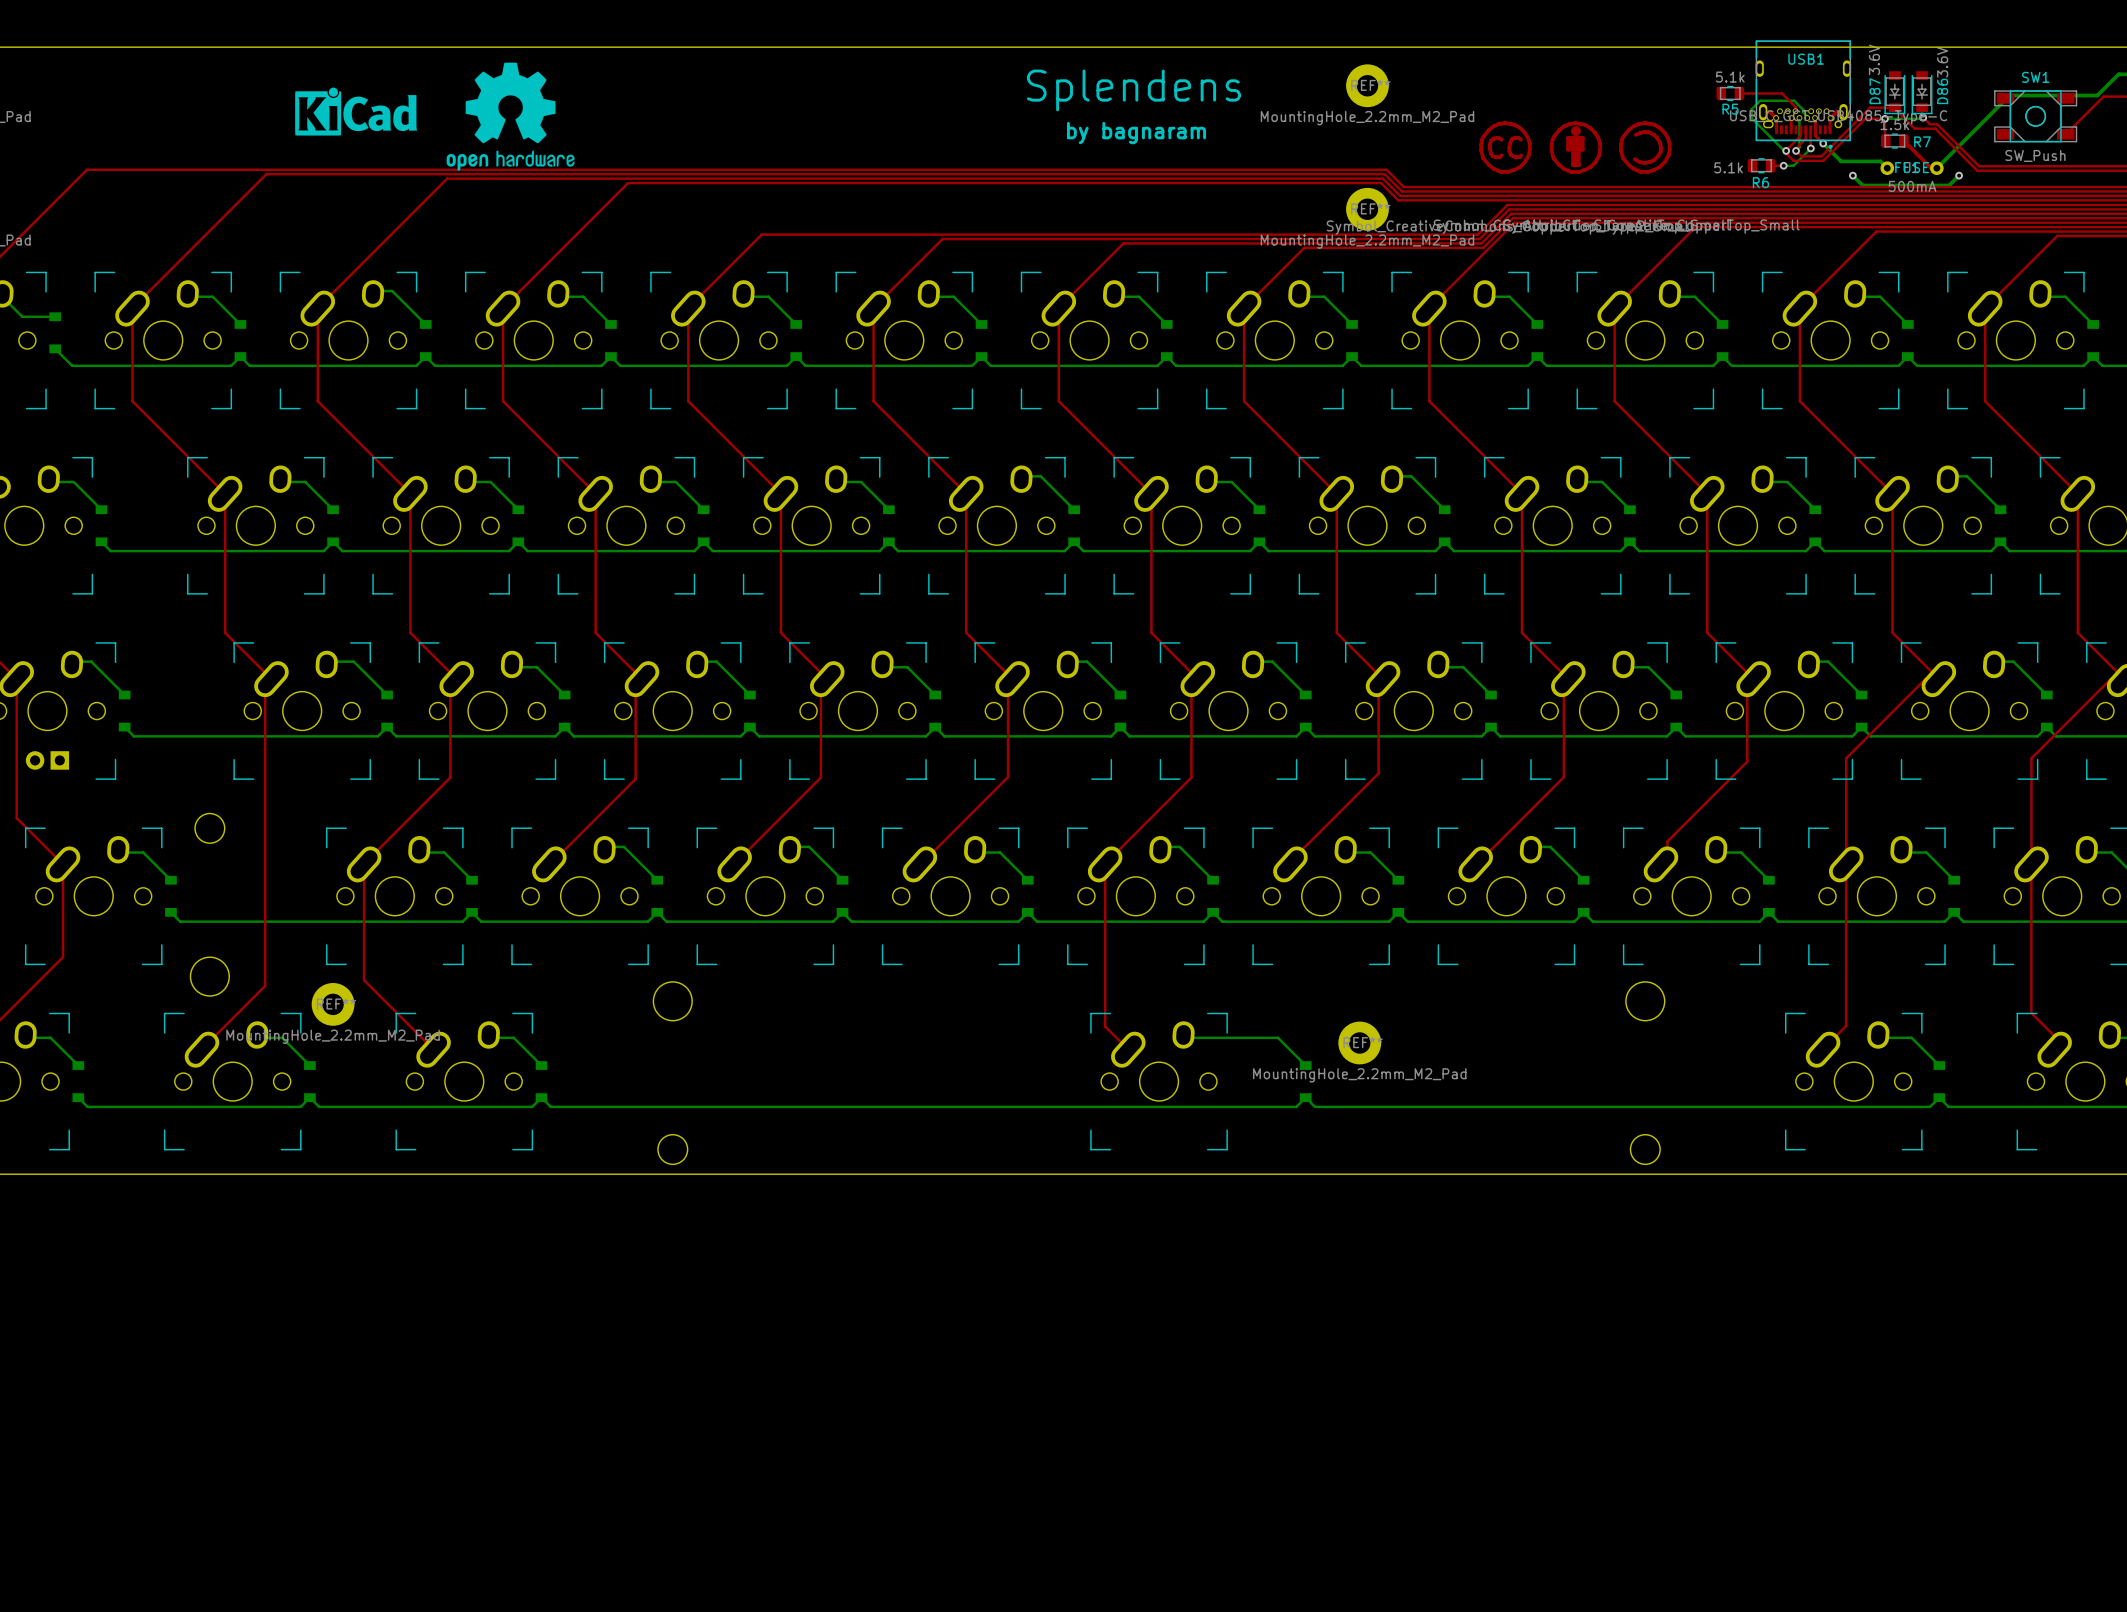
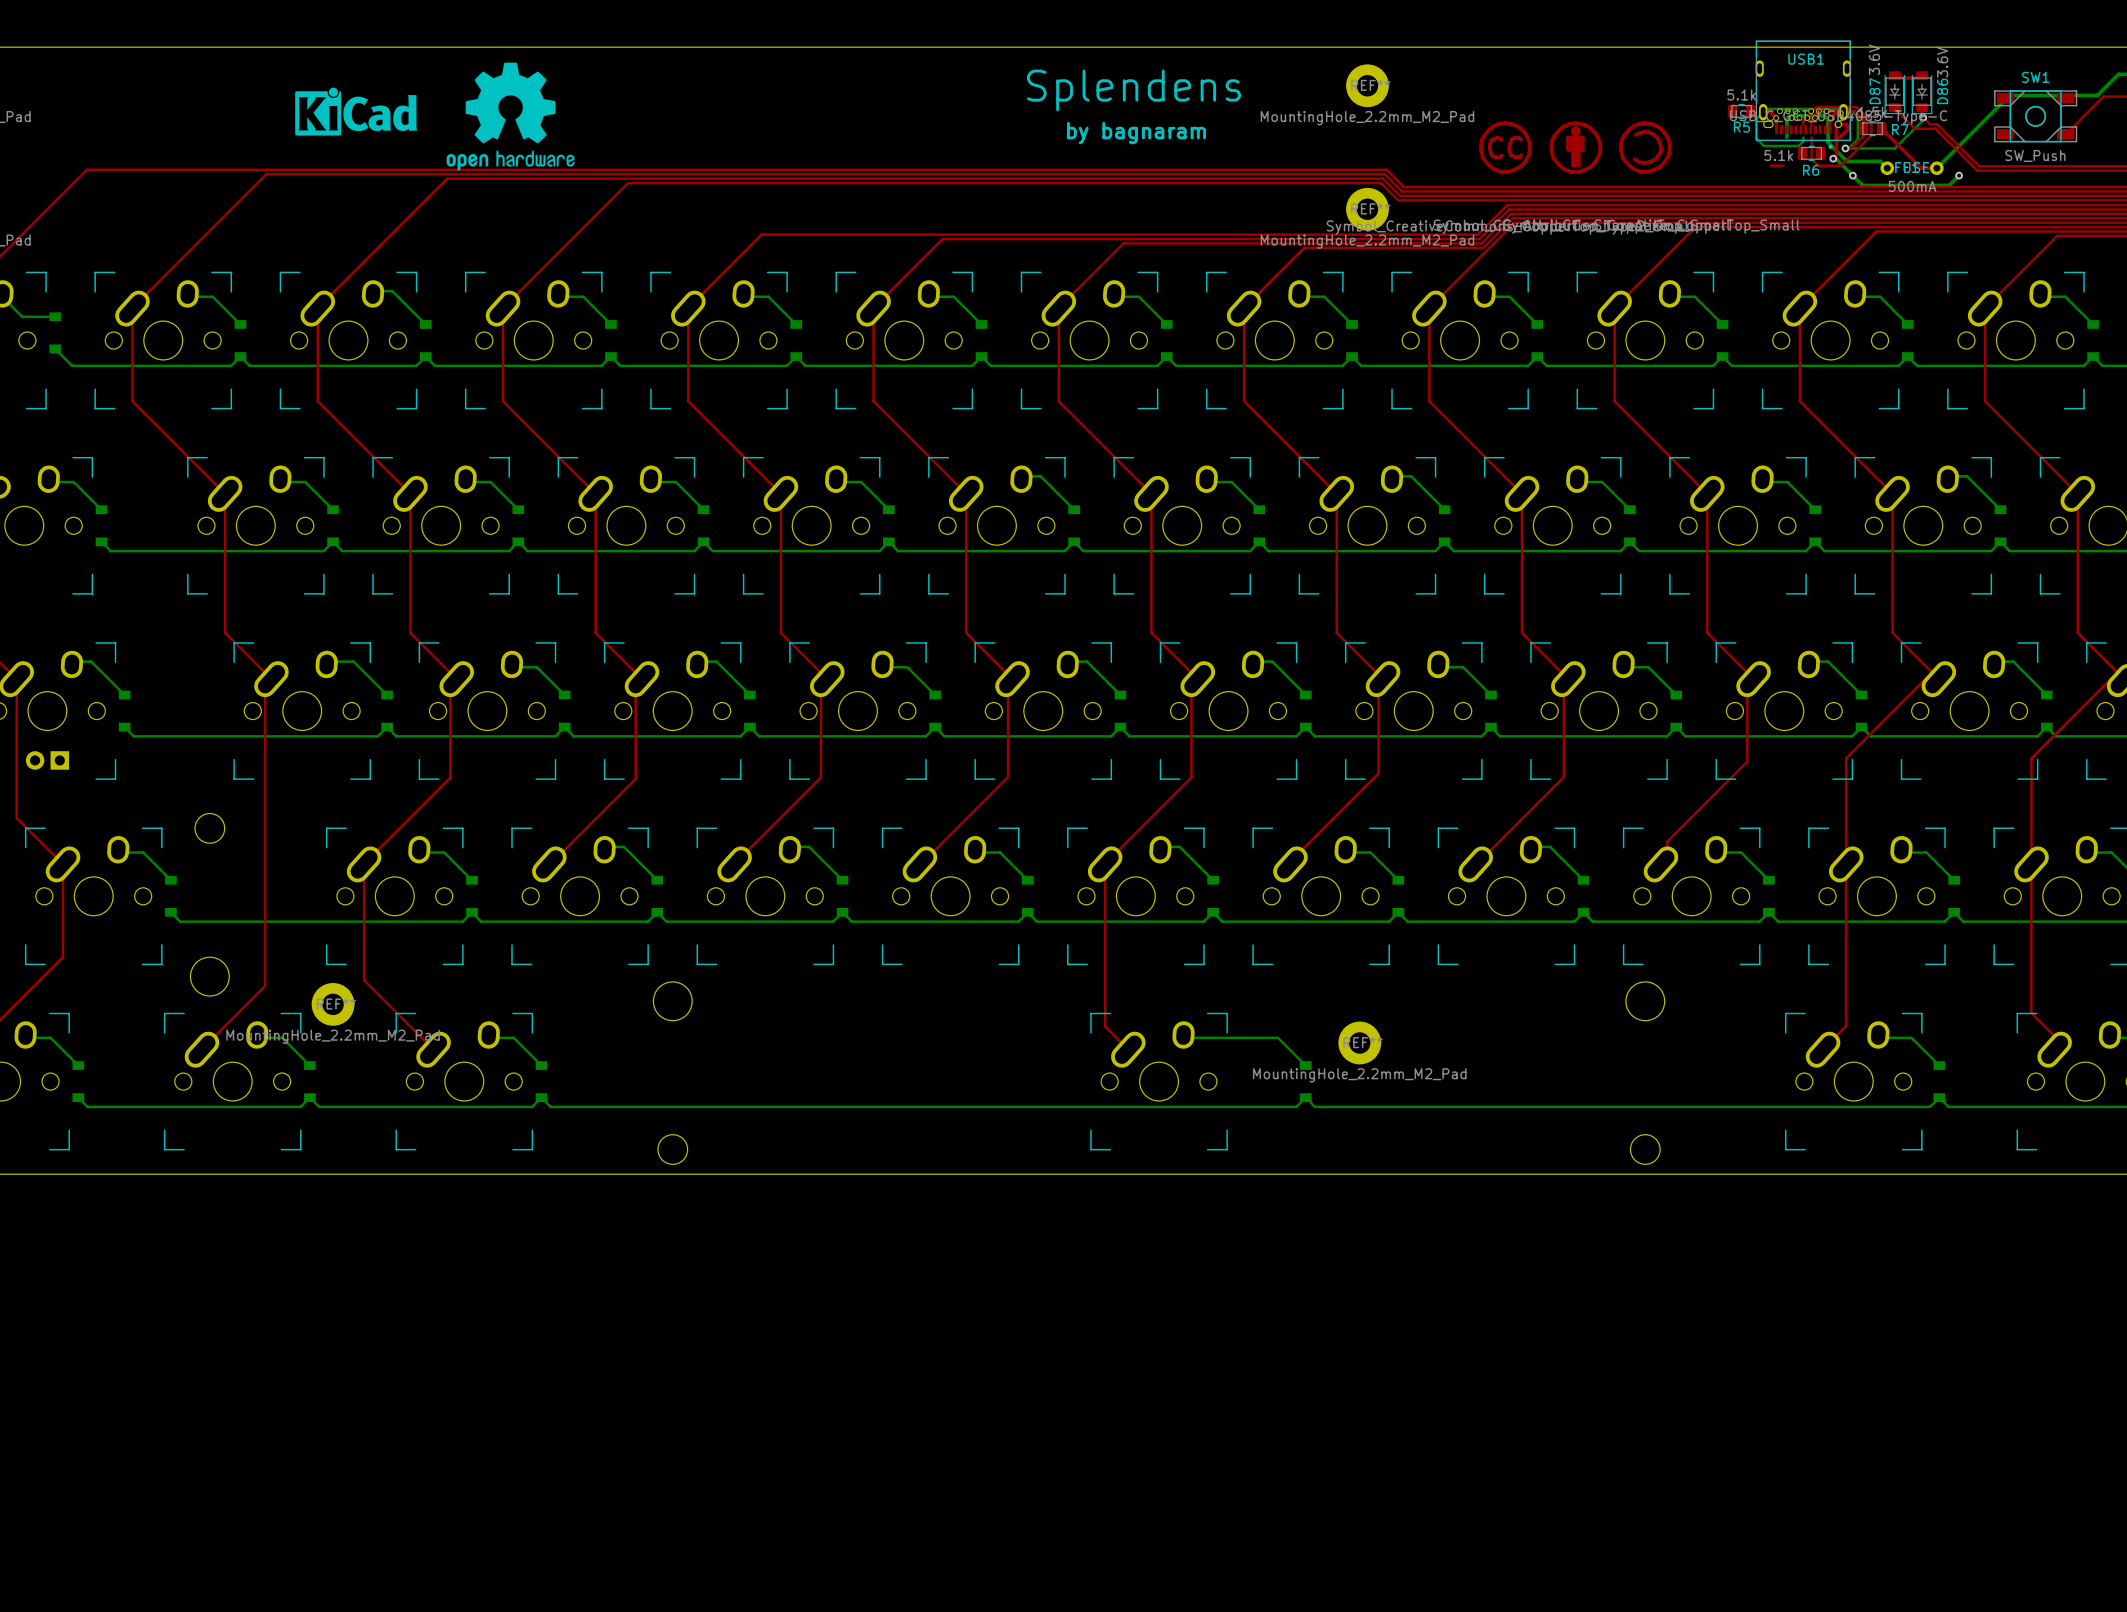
top track: none -> (1899, 78) (1924, 78)
R5 position: (1730, 93) -> (1741, 111)
top track: (1739, 93) (1781, 93) (1795, 107) (1795, 111) -> none
top track: (1894, 107) (1870, 107) (1821, 156) (1801, 156) (1796, 150) (1796, 148) (1805, 138) (1805, 129) -> none
bottom track: (1923, 117) (1884, 118) -> none
top track: (1791, 118) (1791, 129) -> none
bottom track: (1799, 118) (1799, 147) (1796, 150) -> none
bottom track: (1807, 118) (1803, 110) (1794, 100) (1760, 100) (1751, 109) (1751, 118) (1786, 150) -> none
top track: (1815, 118) (1815, 135) (1823, 143) -> none
via: (1884, 118) -> none
bottom track: none -> (1922, 121) (1894, 148) (1845, 148)
top track: none -> (1803, 124) (1803, 120) (1816, 106) (1856, 106) (1871, 121) (1871, 135) (1841, 165) (1818, 165) (1811, 159) (1811, 137)
top track: none -> (1811, 124) (1811, 118) (1818, 111) (1854, 111) (1863, 120) (1863, 135) (1850, 148) (1845, 148)
top track: (1800, 129) (1800, 135) (1786, 150) (1786, 153) (1793, 160) (1823, 160) (1865, 118) (1884, 118) (1884, 140) -> none
top track: (1810, 129) (1810, 148) -> none
bottom track: none -> (1803, 137) (1803, 141) (1798, 145) (1763, 145) (1756, 138) (1756, 118) (1766, 108) (1849, 108) (1857, 117) (1857, 139) (1848, 148)
top track: none -> (1836, 137) (1840, 137) (1849, 127) (1846, 124) (1836, 124) (1836, 155) (1833, 158)
R7 position: (1894, 141) -> (1872, 128)
top track: (1903, 141) (1931, 168) -> (1881, 128) (1921, 168) (1931, 168)
bottom track: (1823, 143) (1841, 161) (1847, 161) -> (1786, 137) (1786, 119) (1790, 115) (1824, 115) (1828, 119) (1828, 142) (1847, 161)
via: (1823, 143) -> none
bottom track: (1810, 148) (1793, 165) (1783, 165) -> none
via: (1810, 148) -> none
via: none -> (1845, 148)
via: (1786, 150) -> none
via: (1796, 150) -> none
bottom track: none -> (1833, 158) (1835, 158) (1852, 175)
via: none -> (1833, 158)
R6 position: (1761, 165) -> (1811, 153)
via: (1783, 165) -> none

